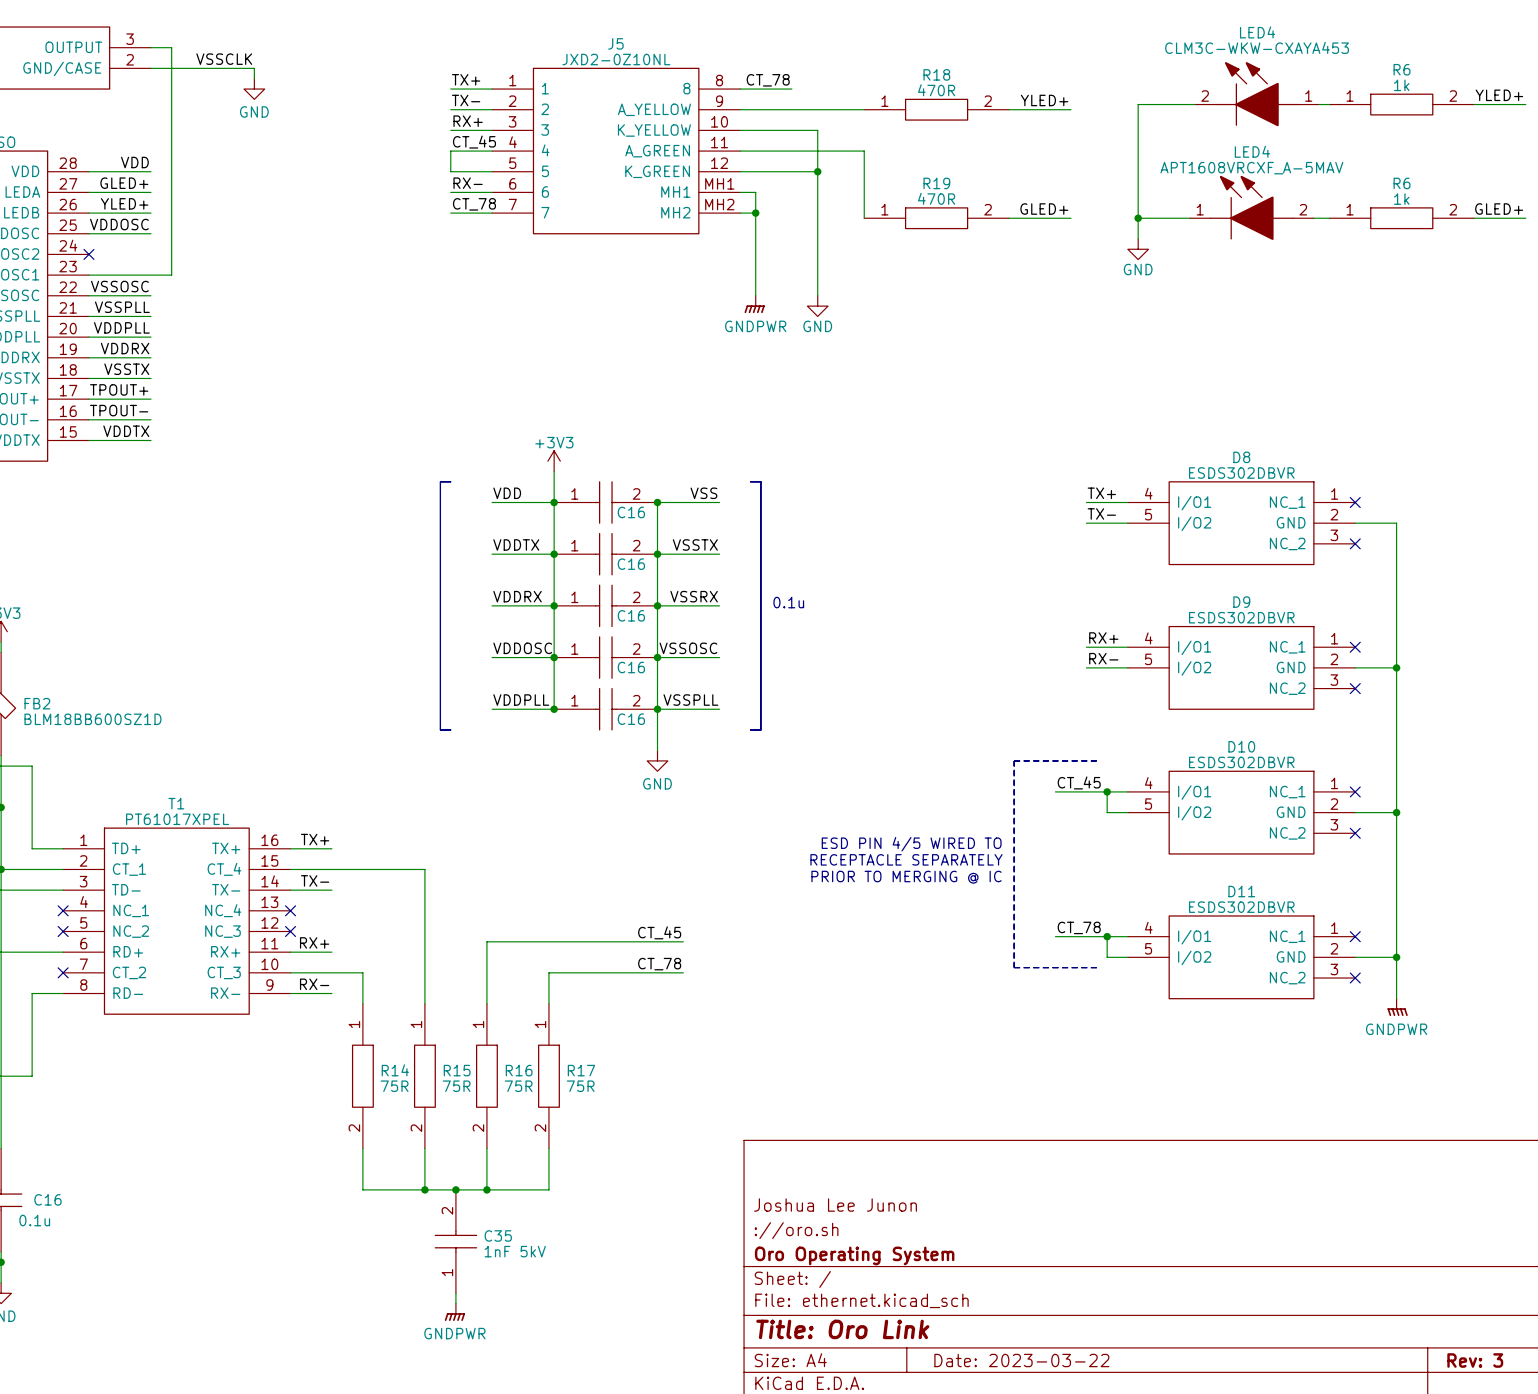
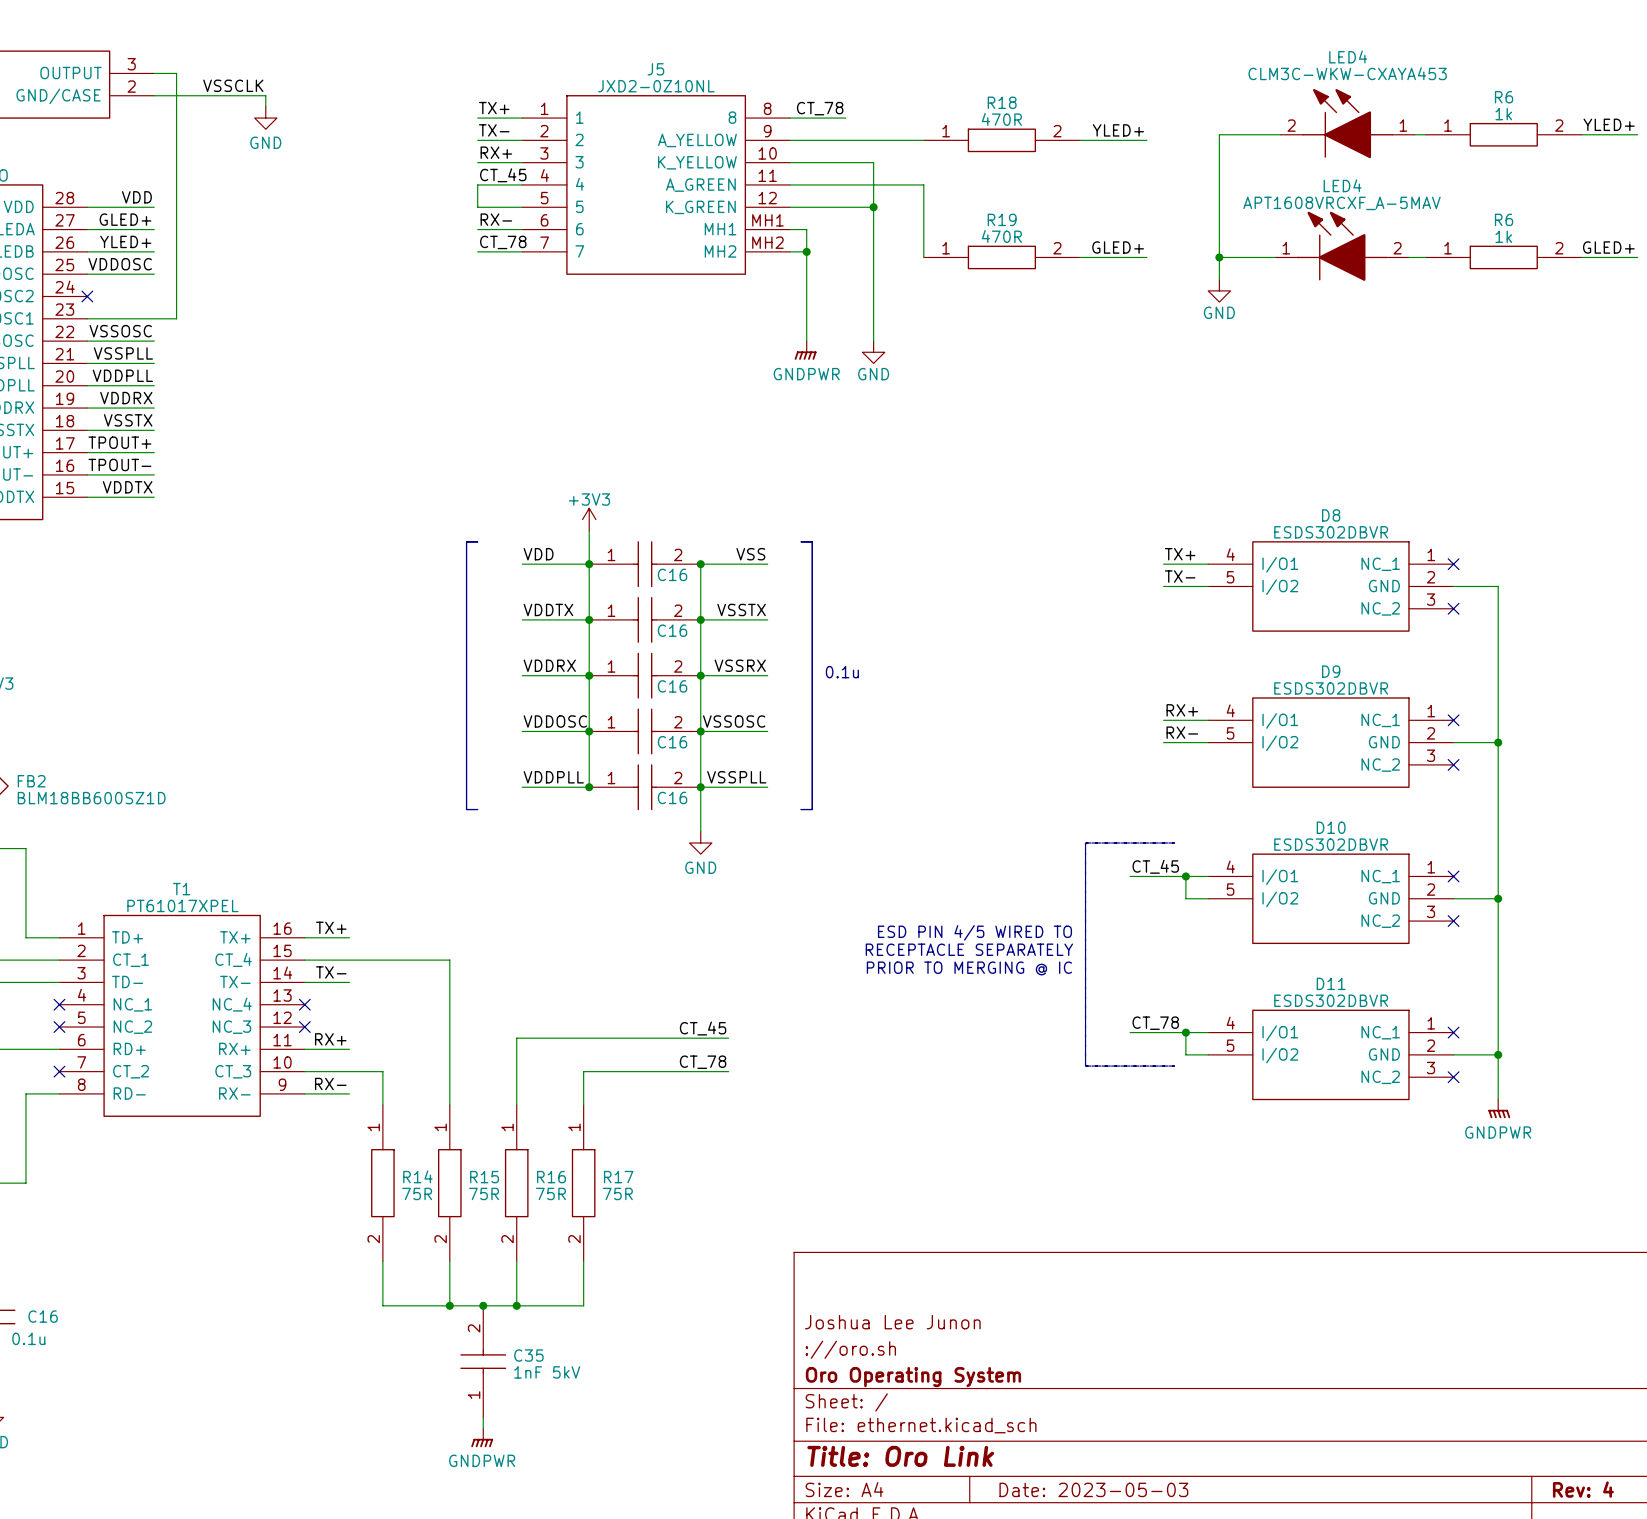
title block: Date: 2023-03-22 (1021, 1360) -> Date: 2023-05-03 (1093, 1489)
title block: Rev: 3 (1475, 1360) -> Rev: 4 (1583, 1489)

